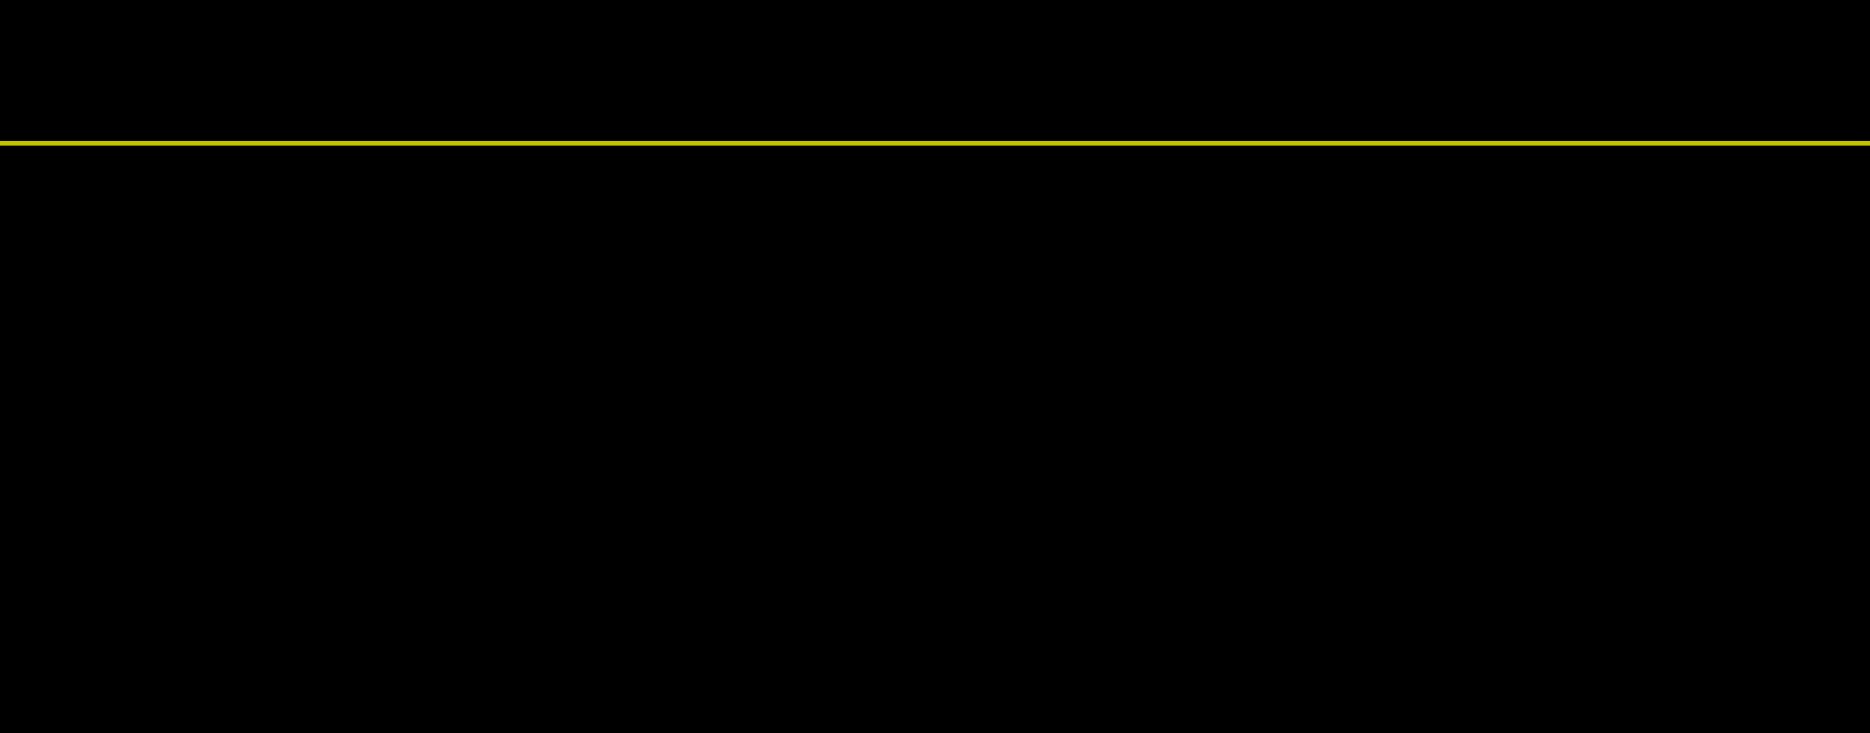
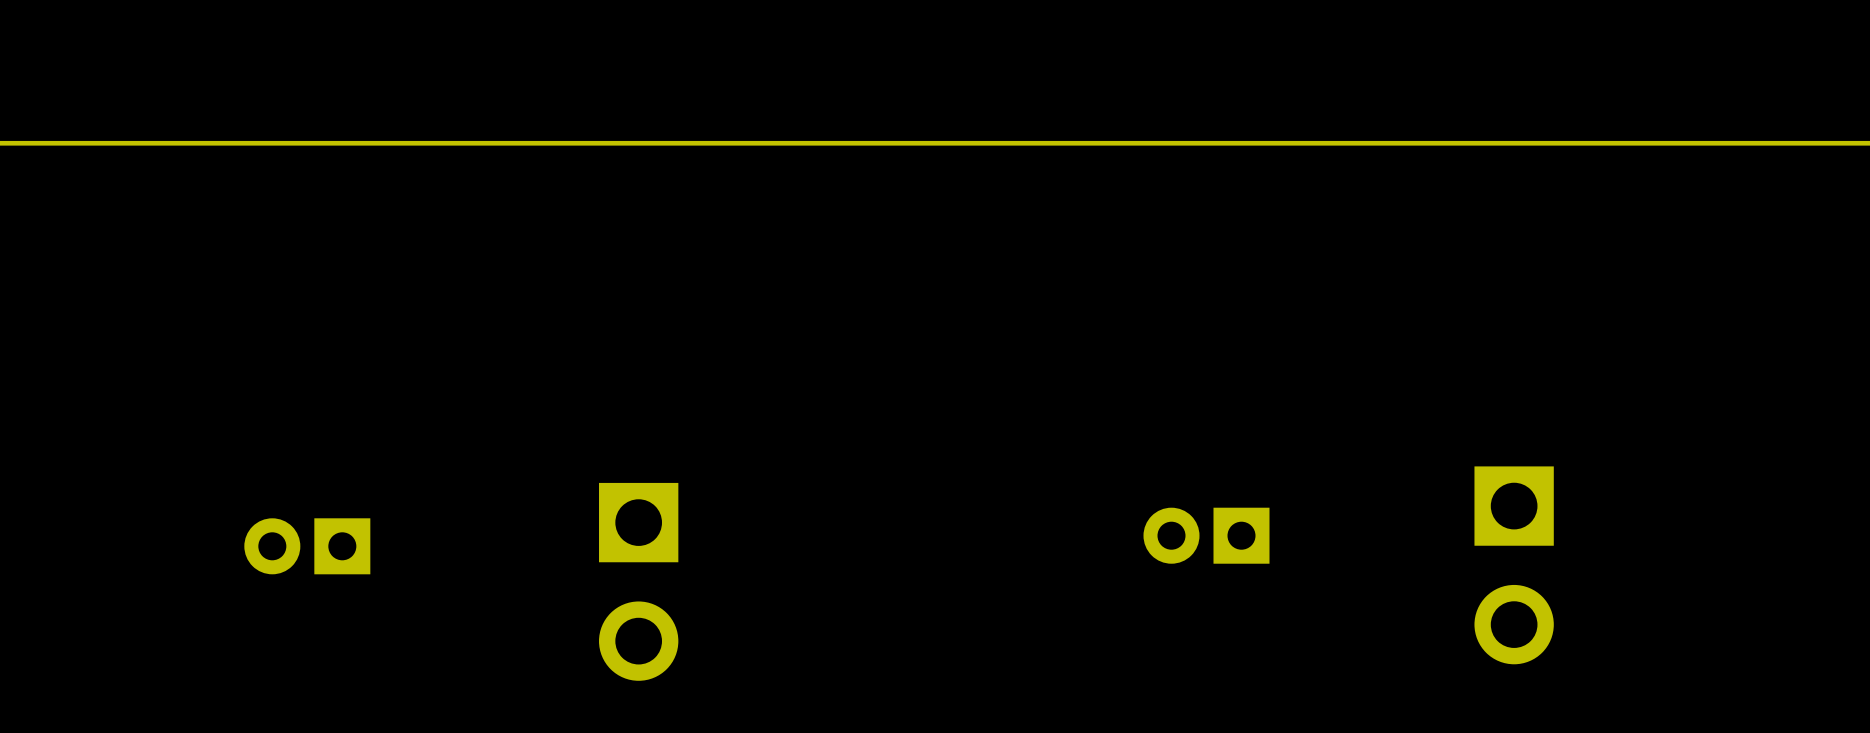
part: none -> (1206, 535)
part: none -> (307, 546)
part: none -> (1514, 565)
part: none -> (638, 581)

